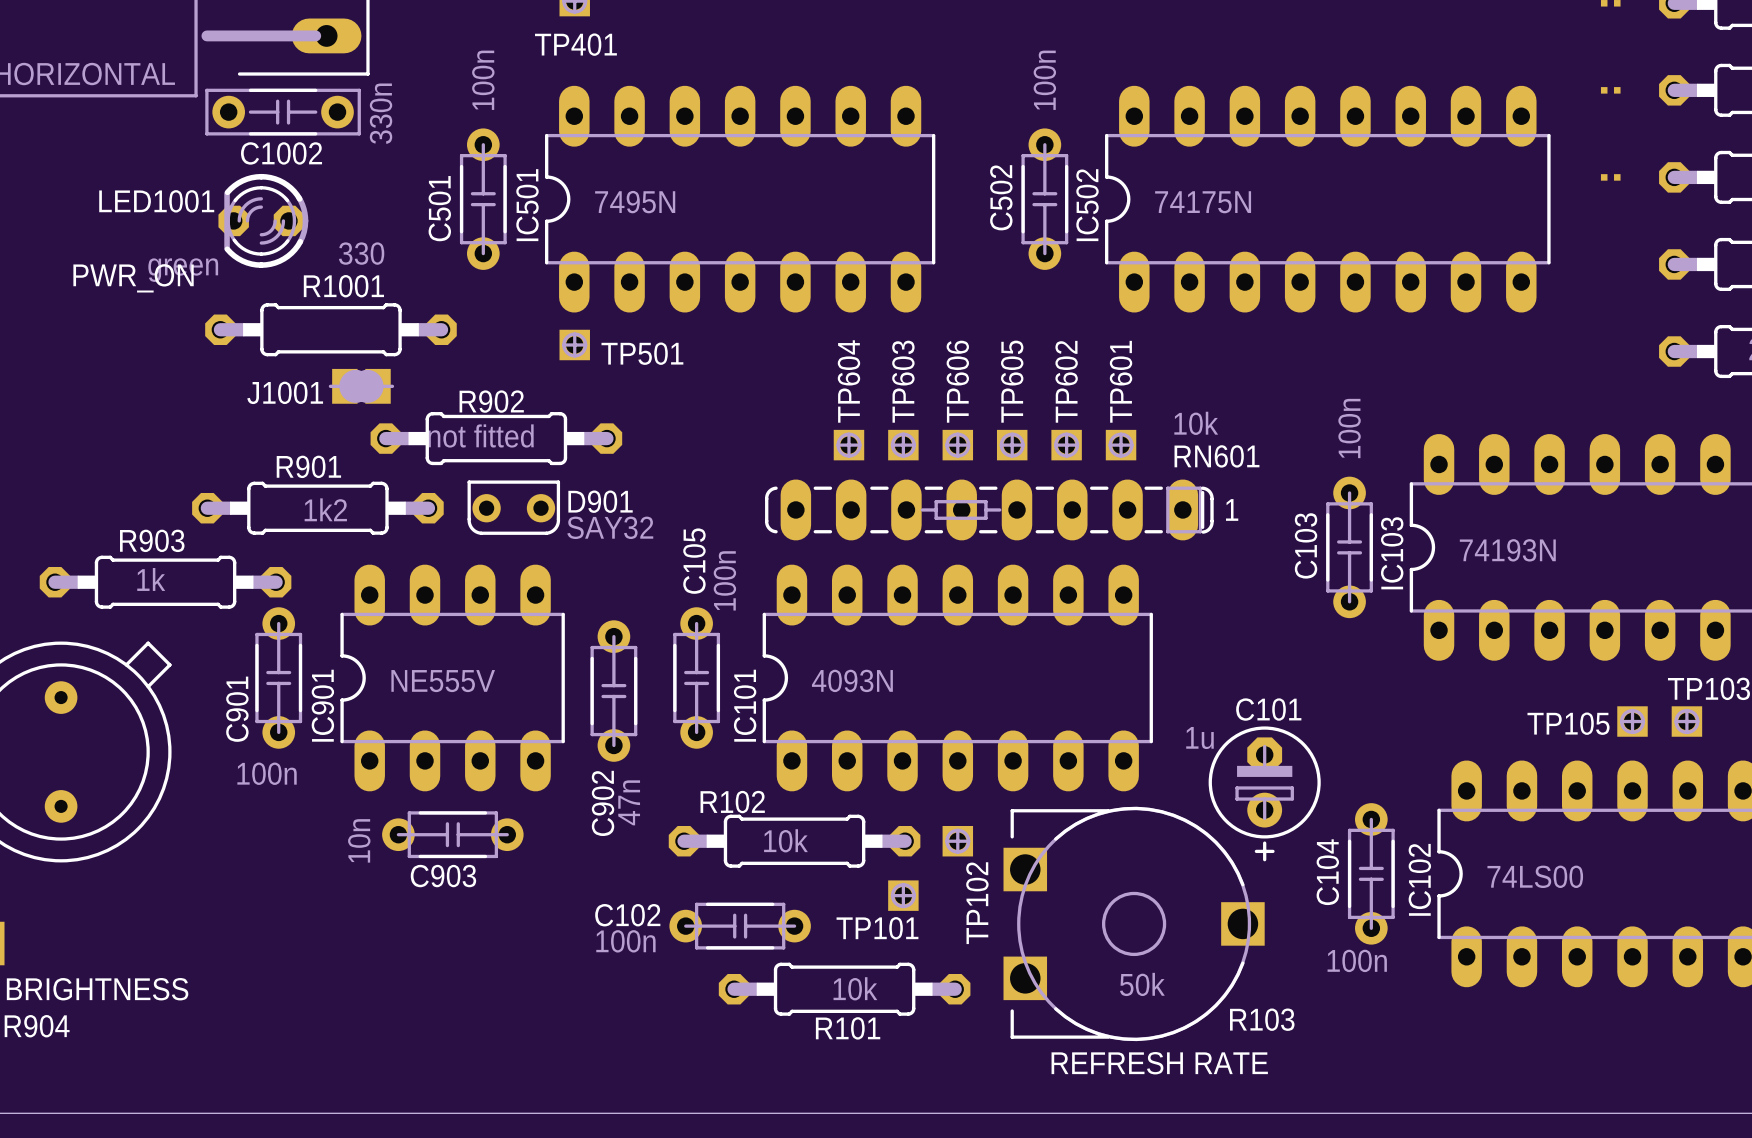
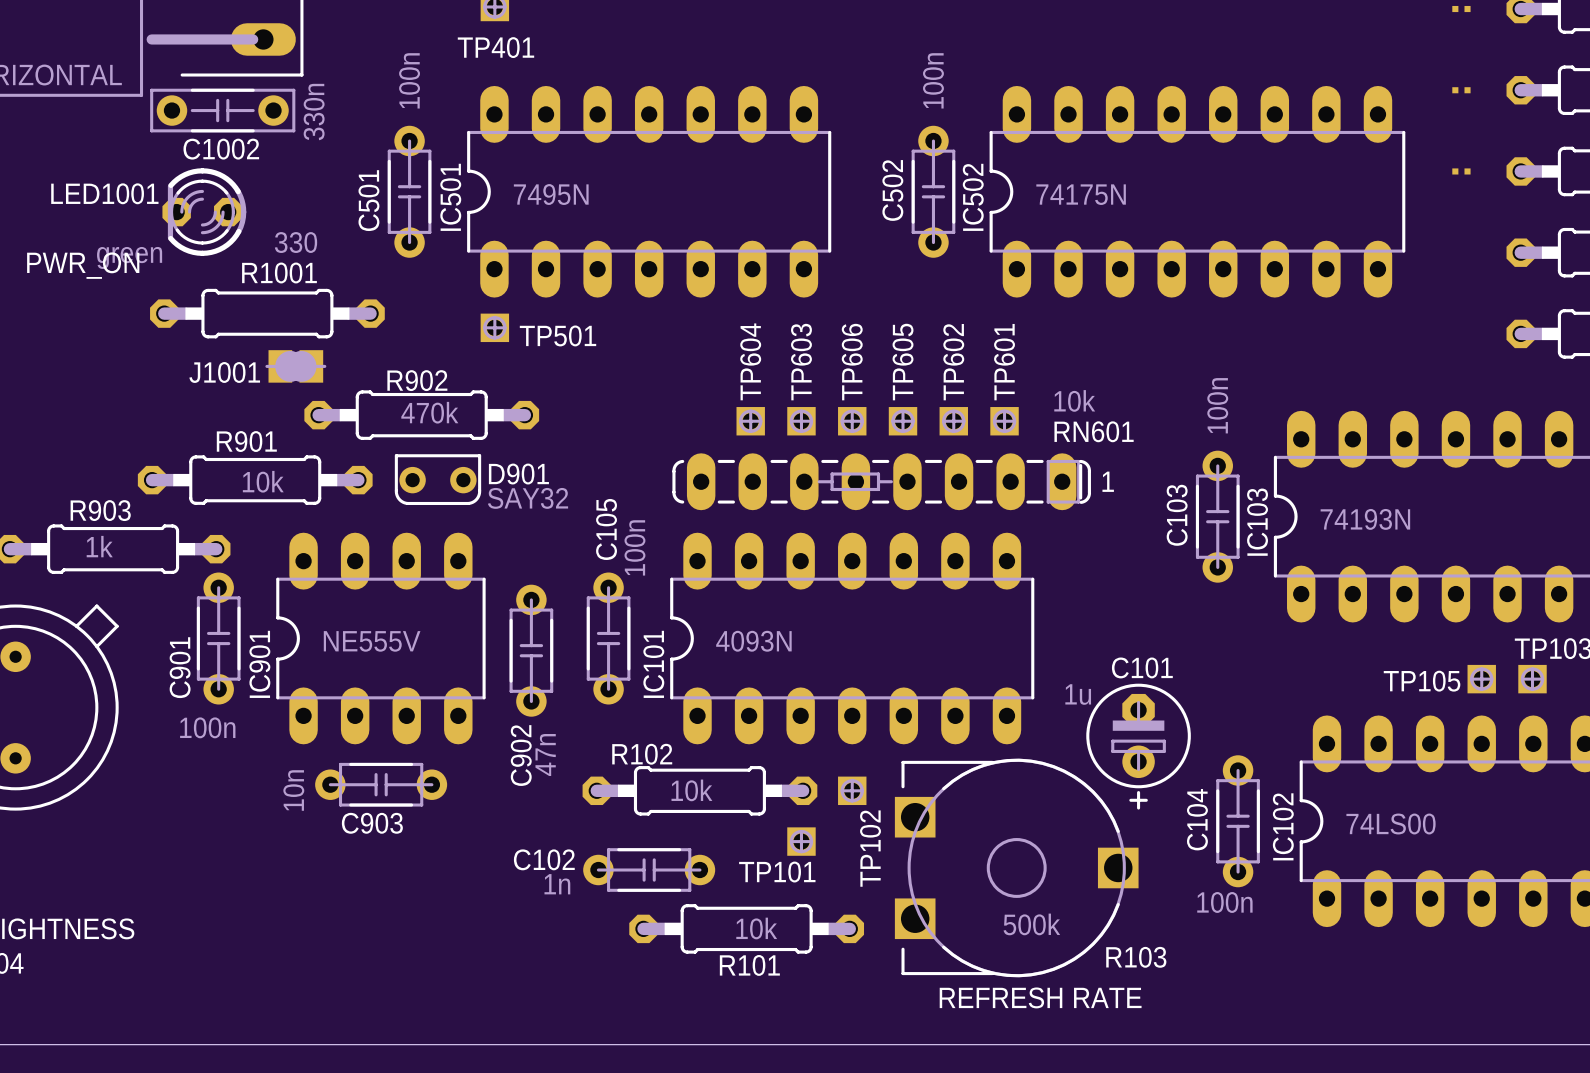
R902 value: not fitted (480, 435) -> 470k (429, 412)
R901 value: 1k2 (325, 509) -> 10k (263, 481)
C102 value: 100n (625, 941) -> 1n (557, 884)
R103 value: 50k (1142, 984) -> 500k (1031, 924)

